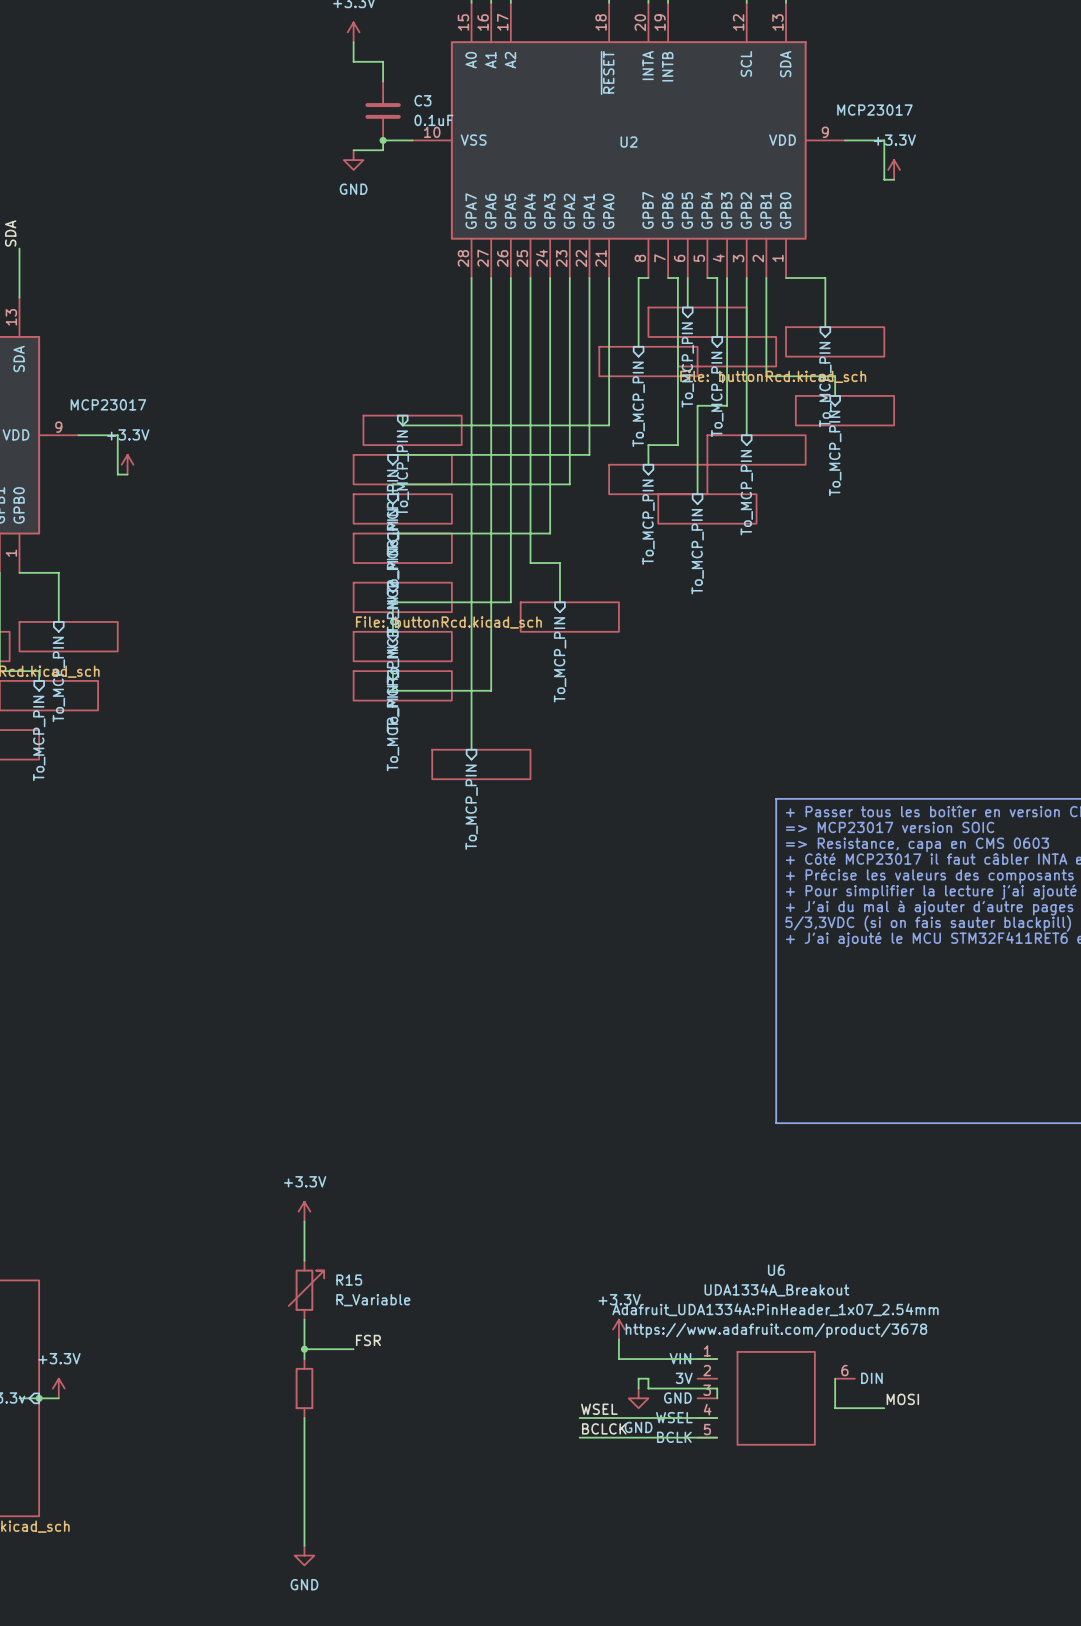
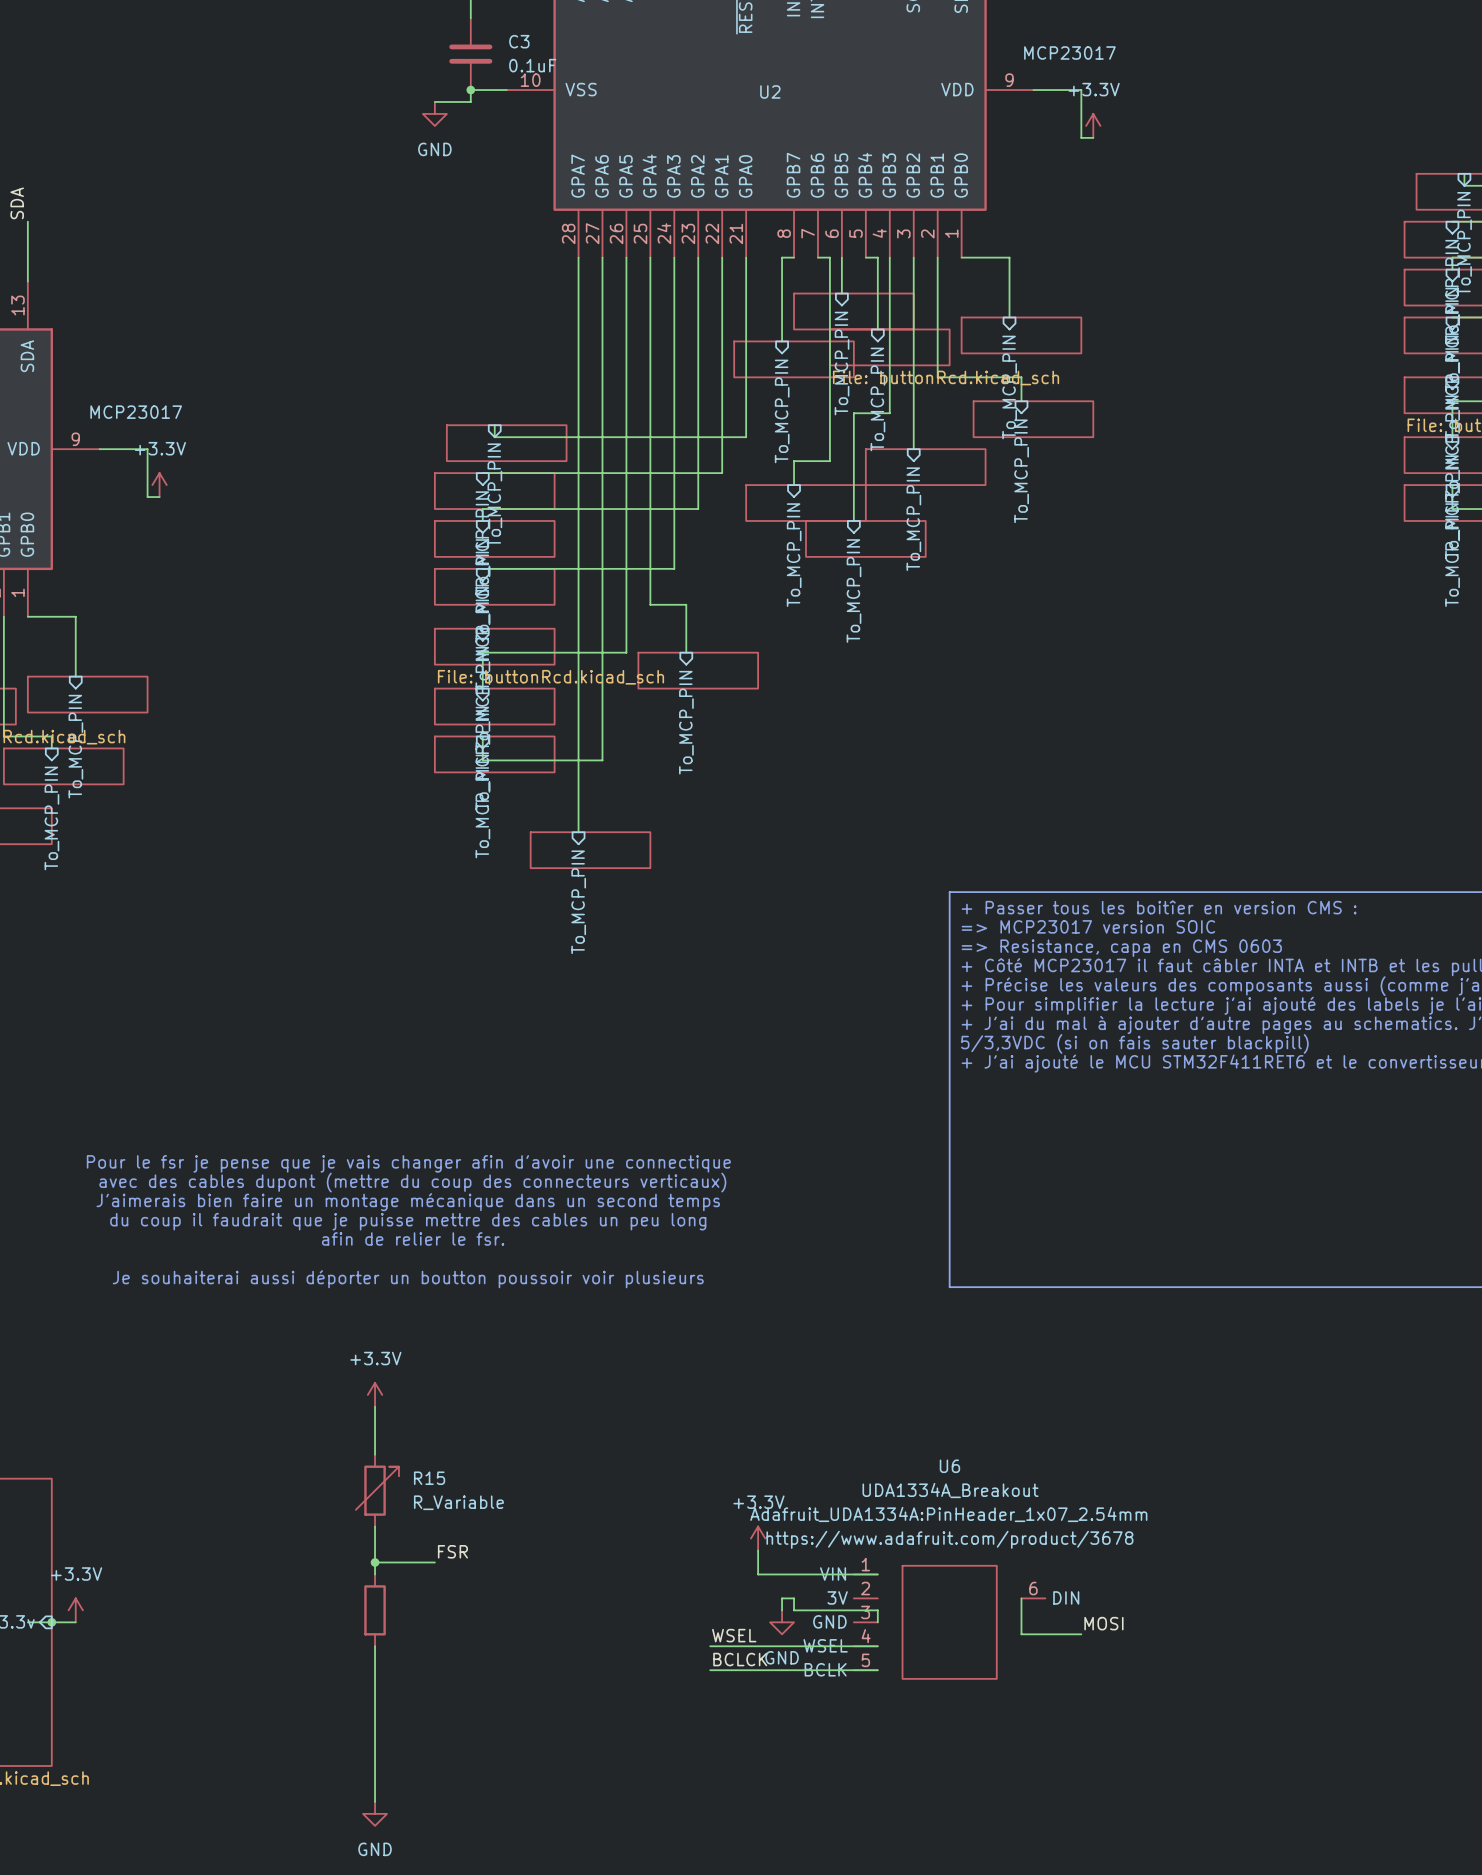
text: none -> Pour le fsr je pense que je vais changer afin d'avoir une connectique (408, 1163)
text: none -> avec des cables dupont (mettre du coup des connecteurs verticaux) (412, 1182)
text: none -> J'aimerais bien faire un montage mécanique dans un second temps (408, 1202)
text: none -> du coup il faudrait que je puisse mettre des cables un peu long (408, 1221)
text: none -> afin de relier le fsr. (413, 1238)
text: none -> Je souhaiterai aussi déporter un boutton poussoir voir plusieurs (408, 1279)

